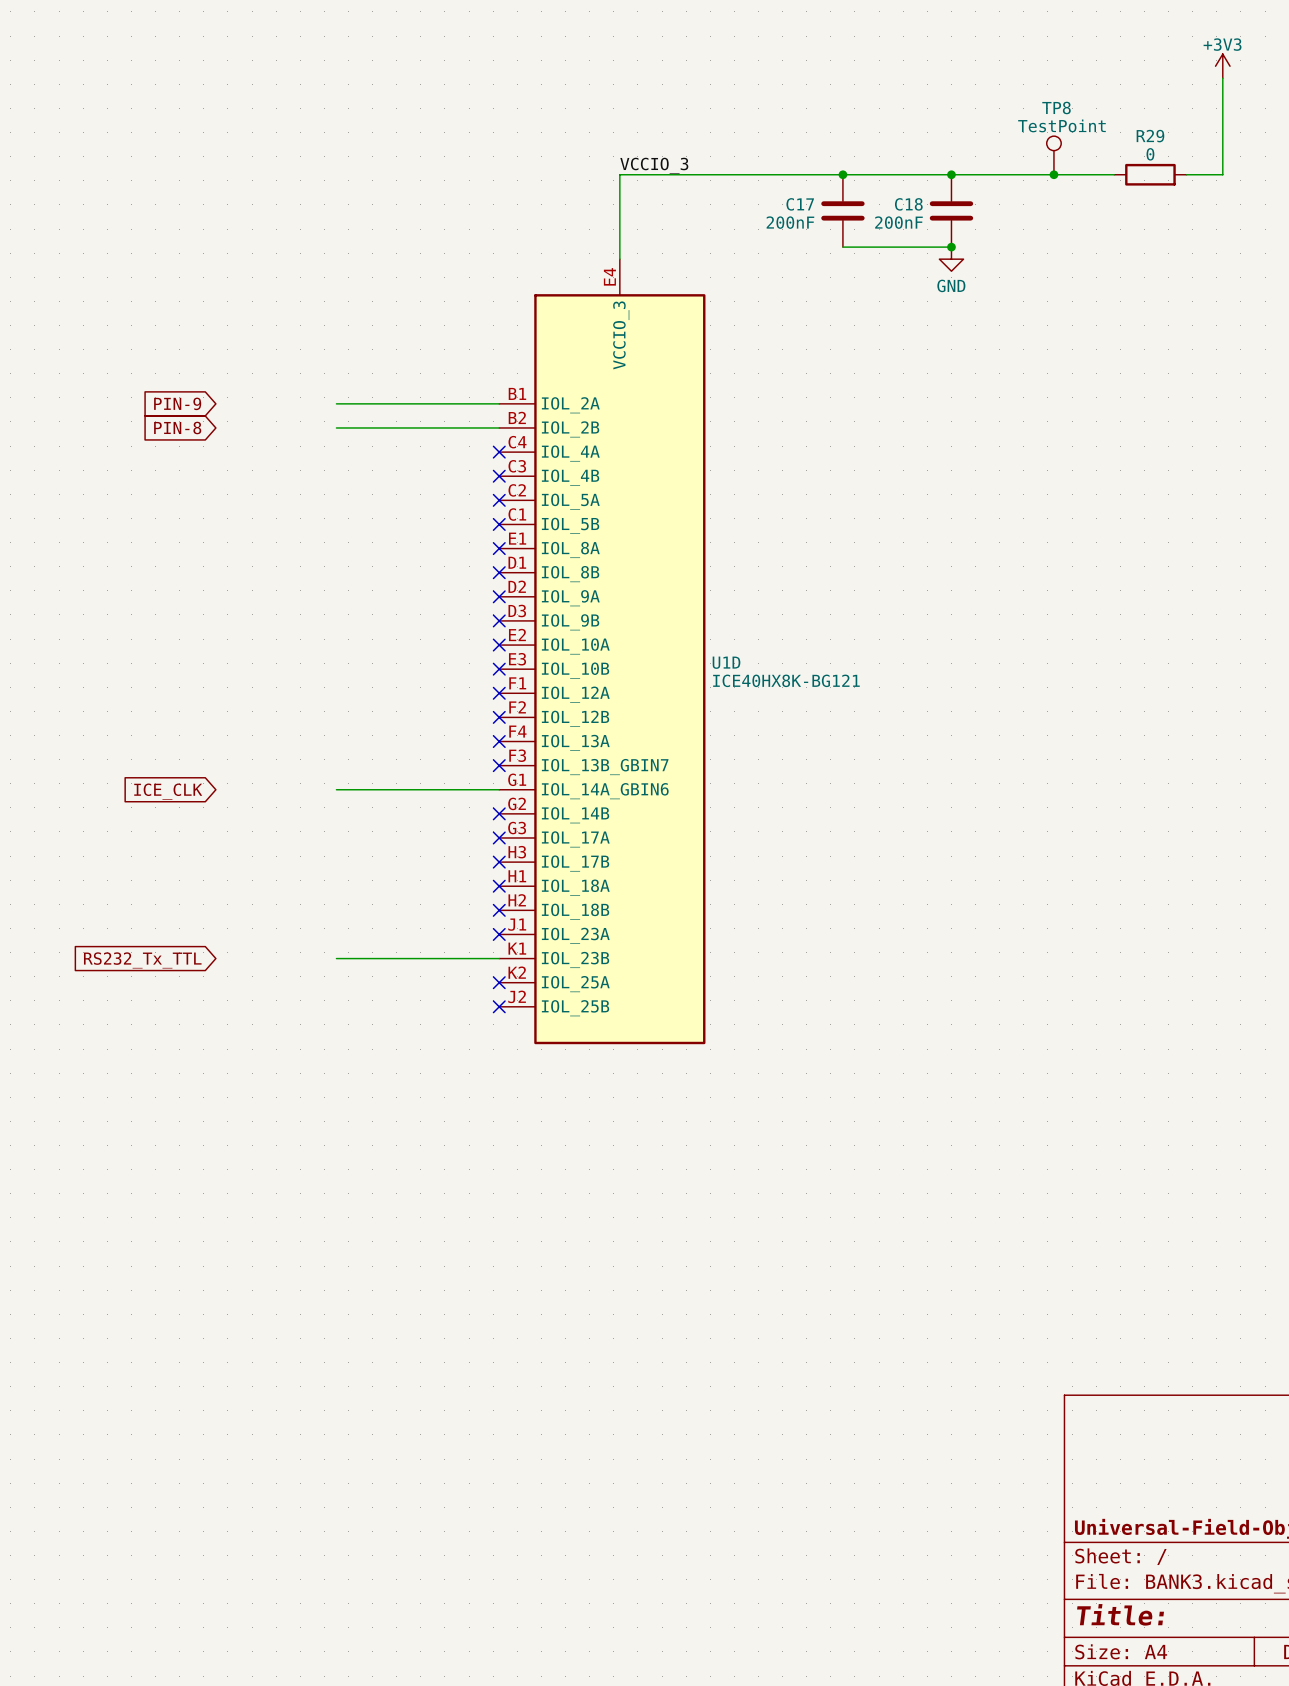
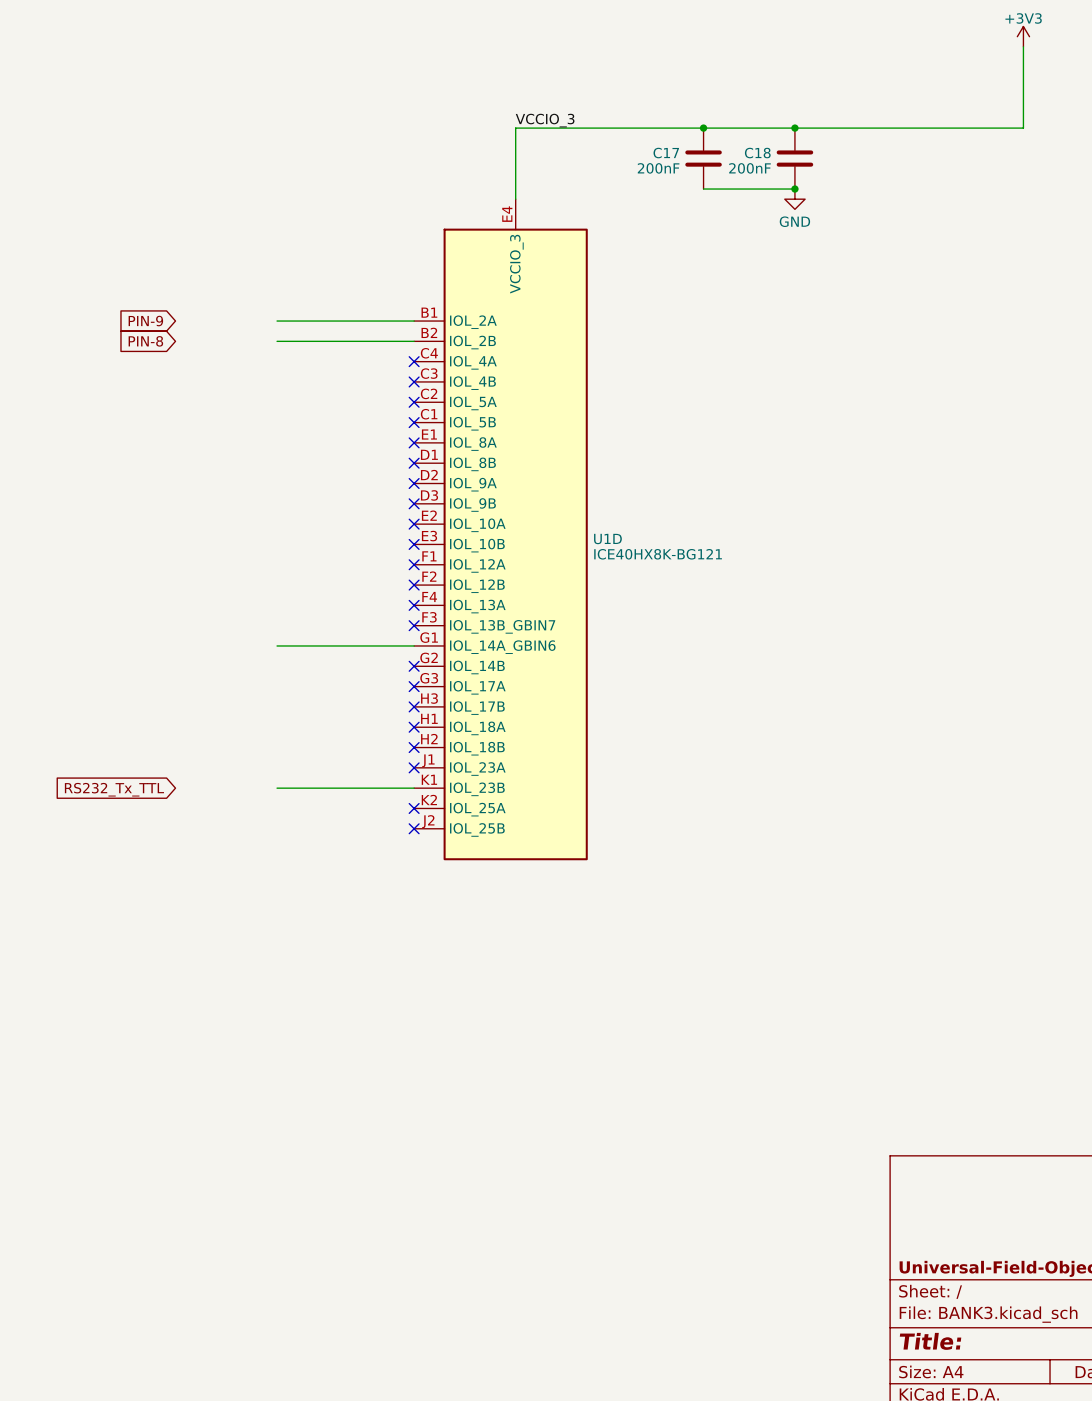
TP8: TestPoint (1053, 155) -> none
junction: (1053, 174) -> none
wire: none -> (932, 128) (992, 128)
R29: 0 (1150, 174) -> none
global label: ICE_CLK (168, 791) -> none

